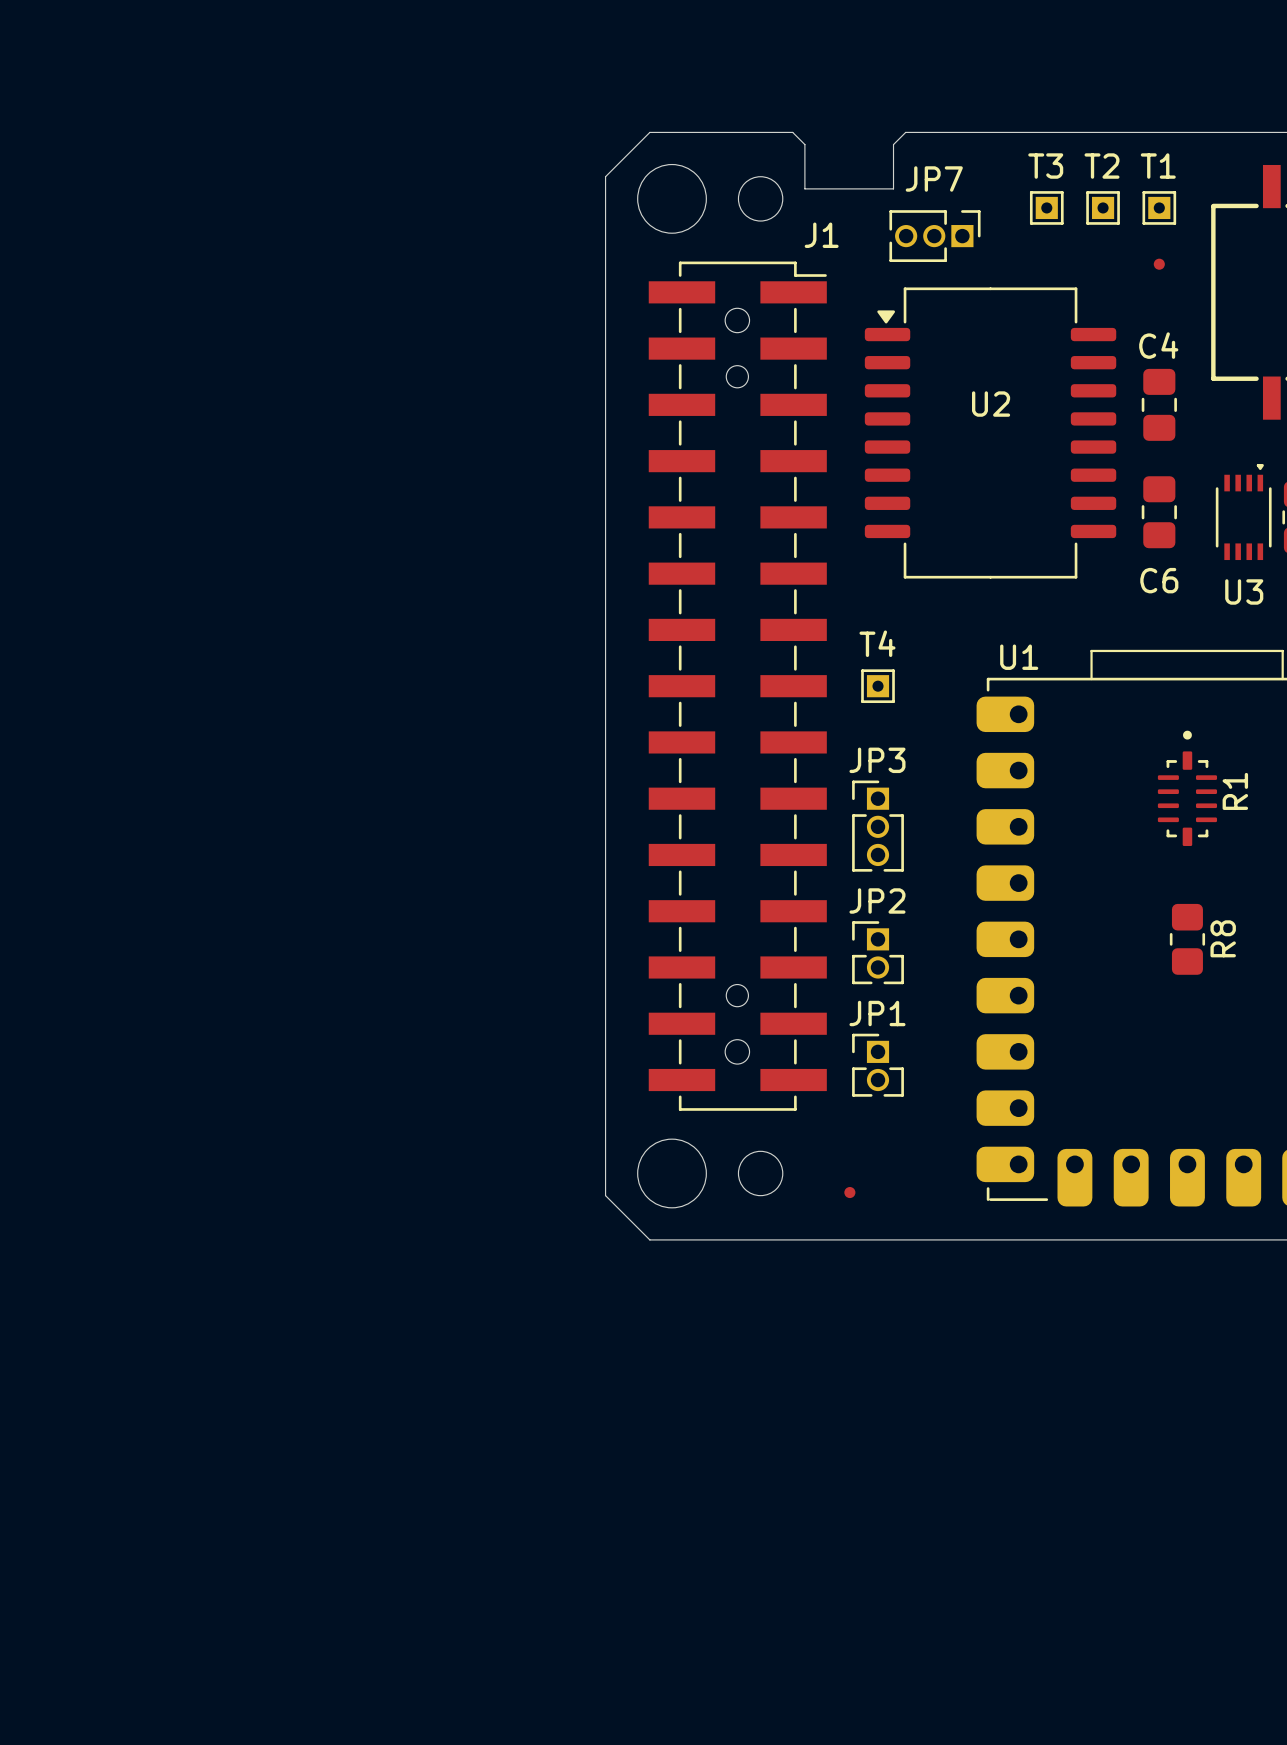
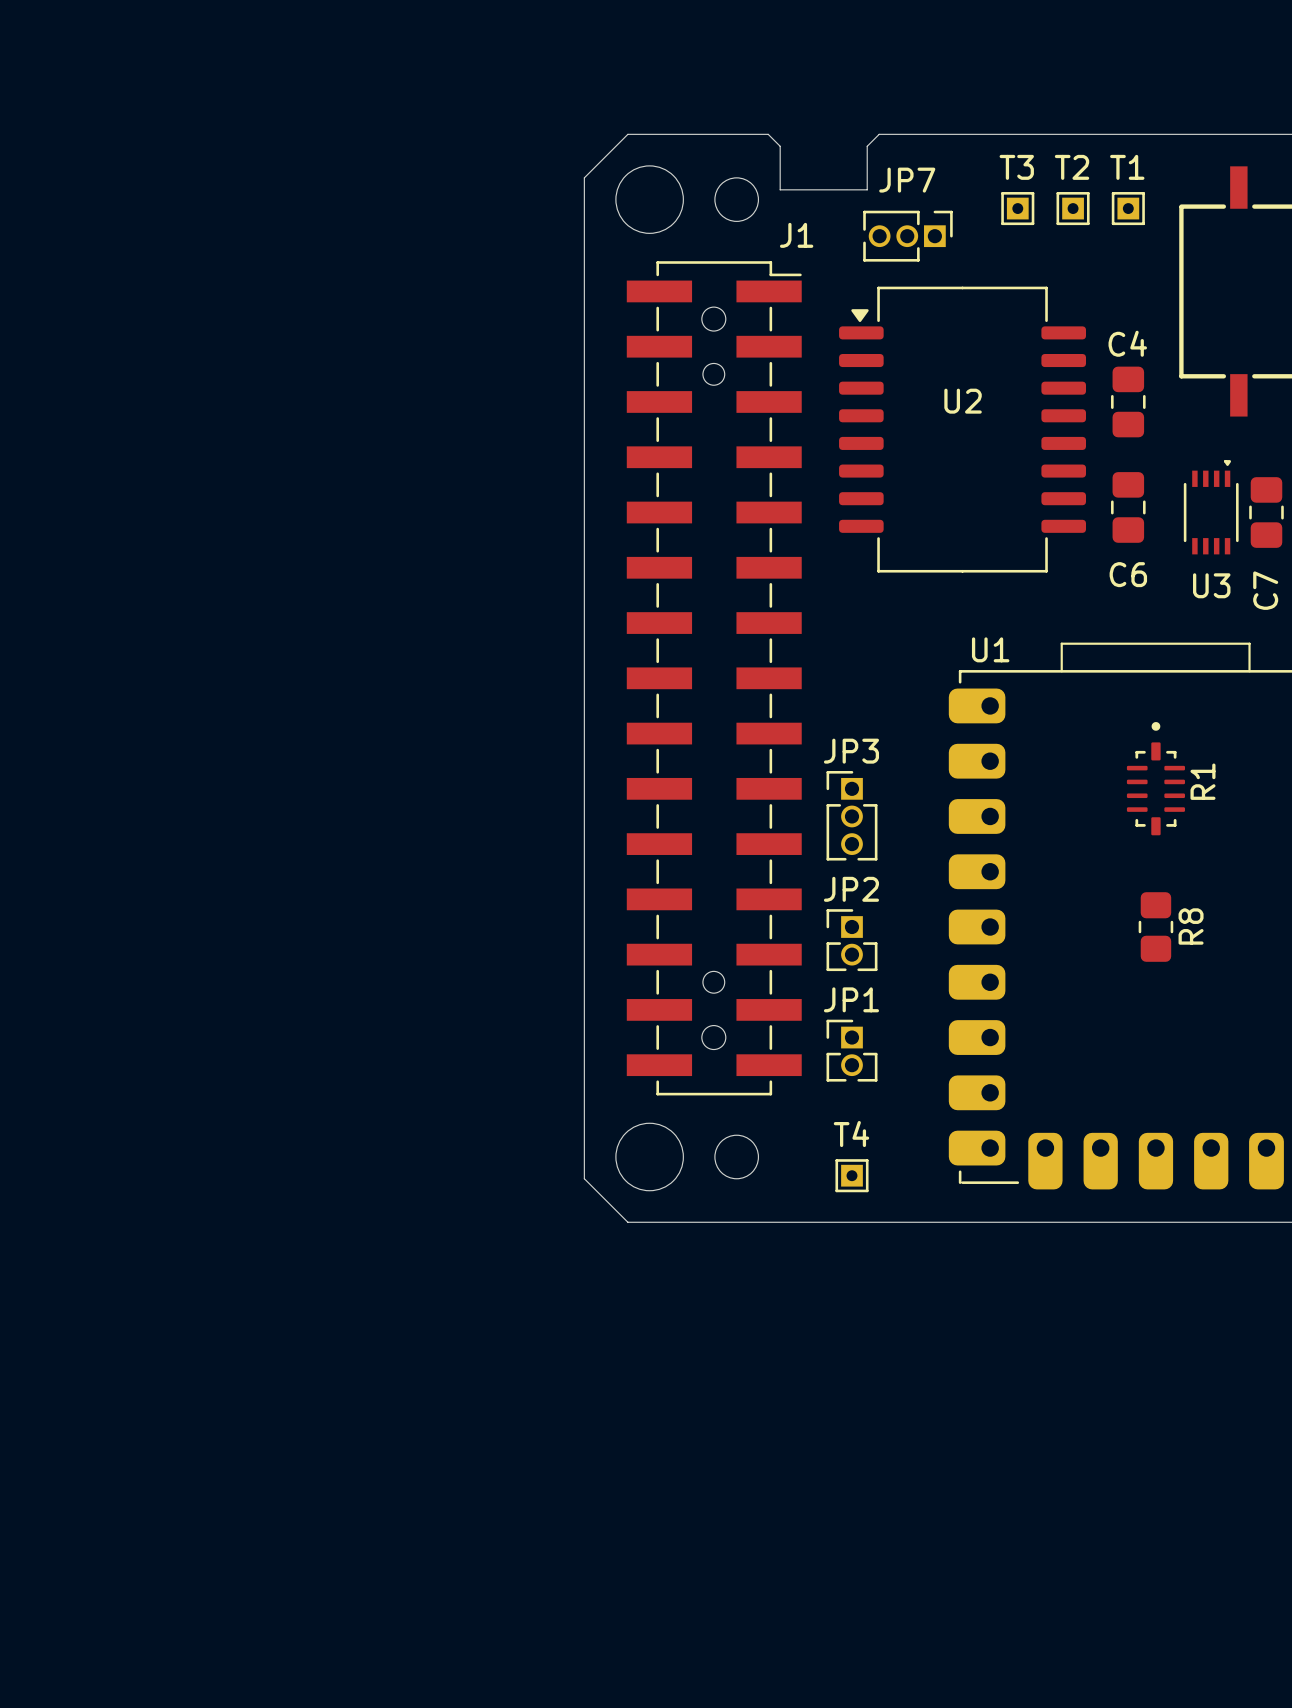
part: (1159, 264) -> none
T4 position: (878, 686) -> (851, 1175)
part: (849, 1192) -> none

